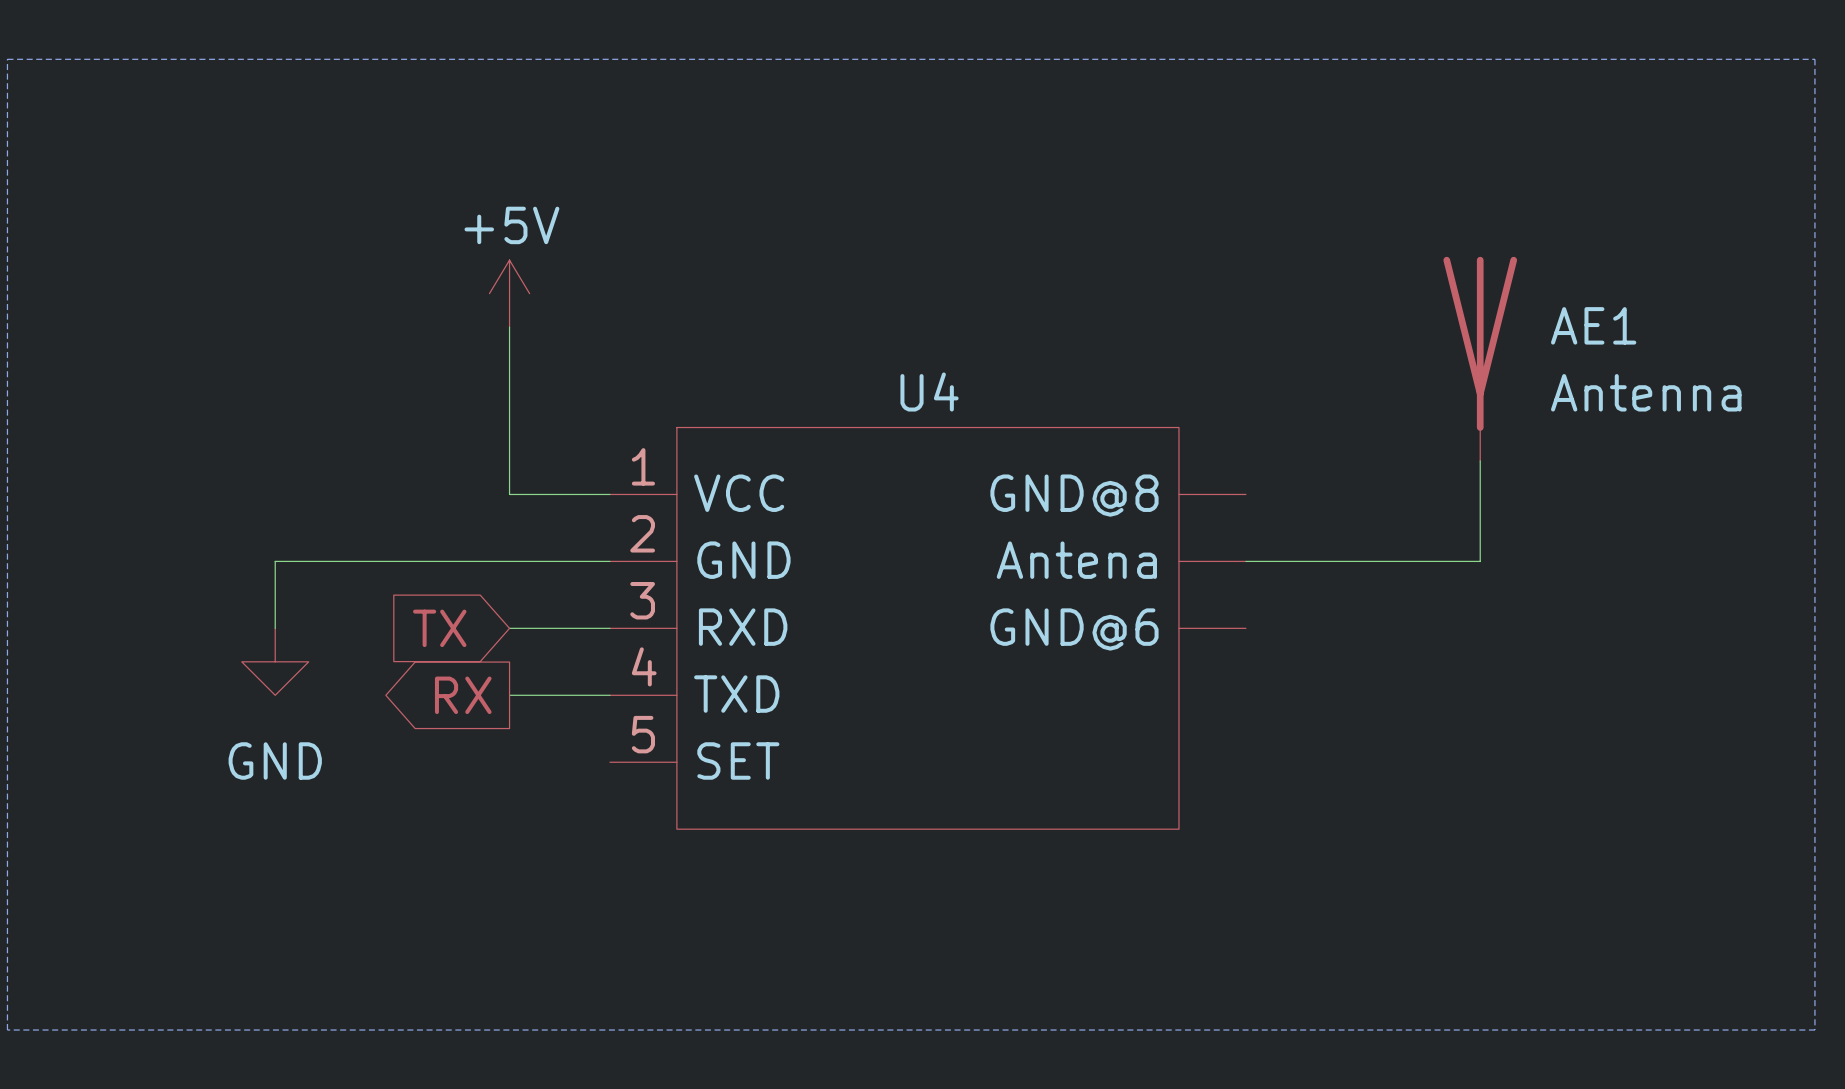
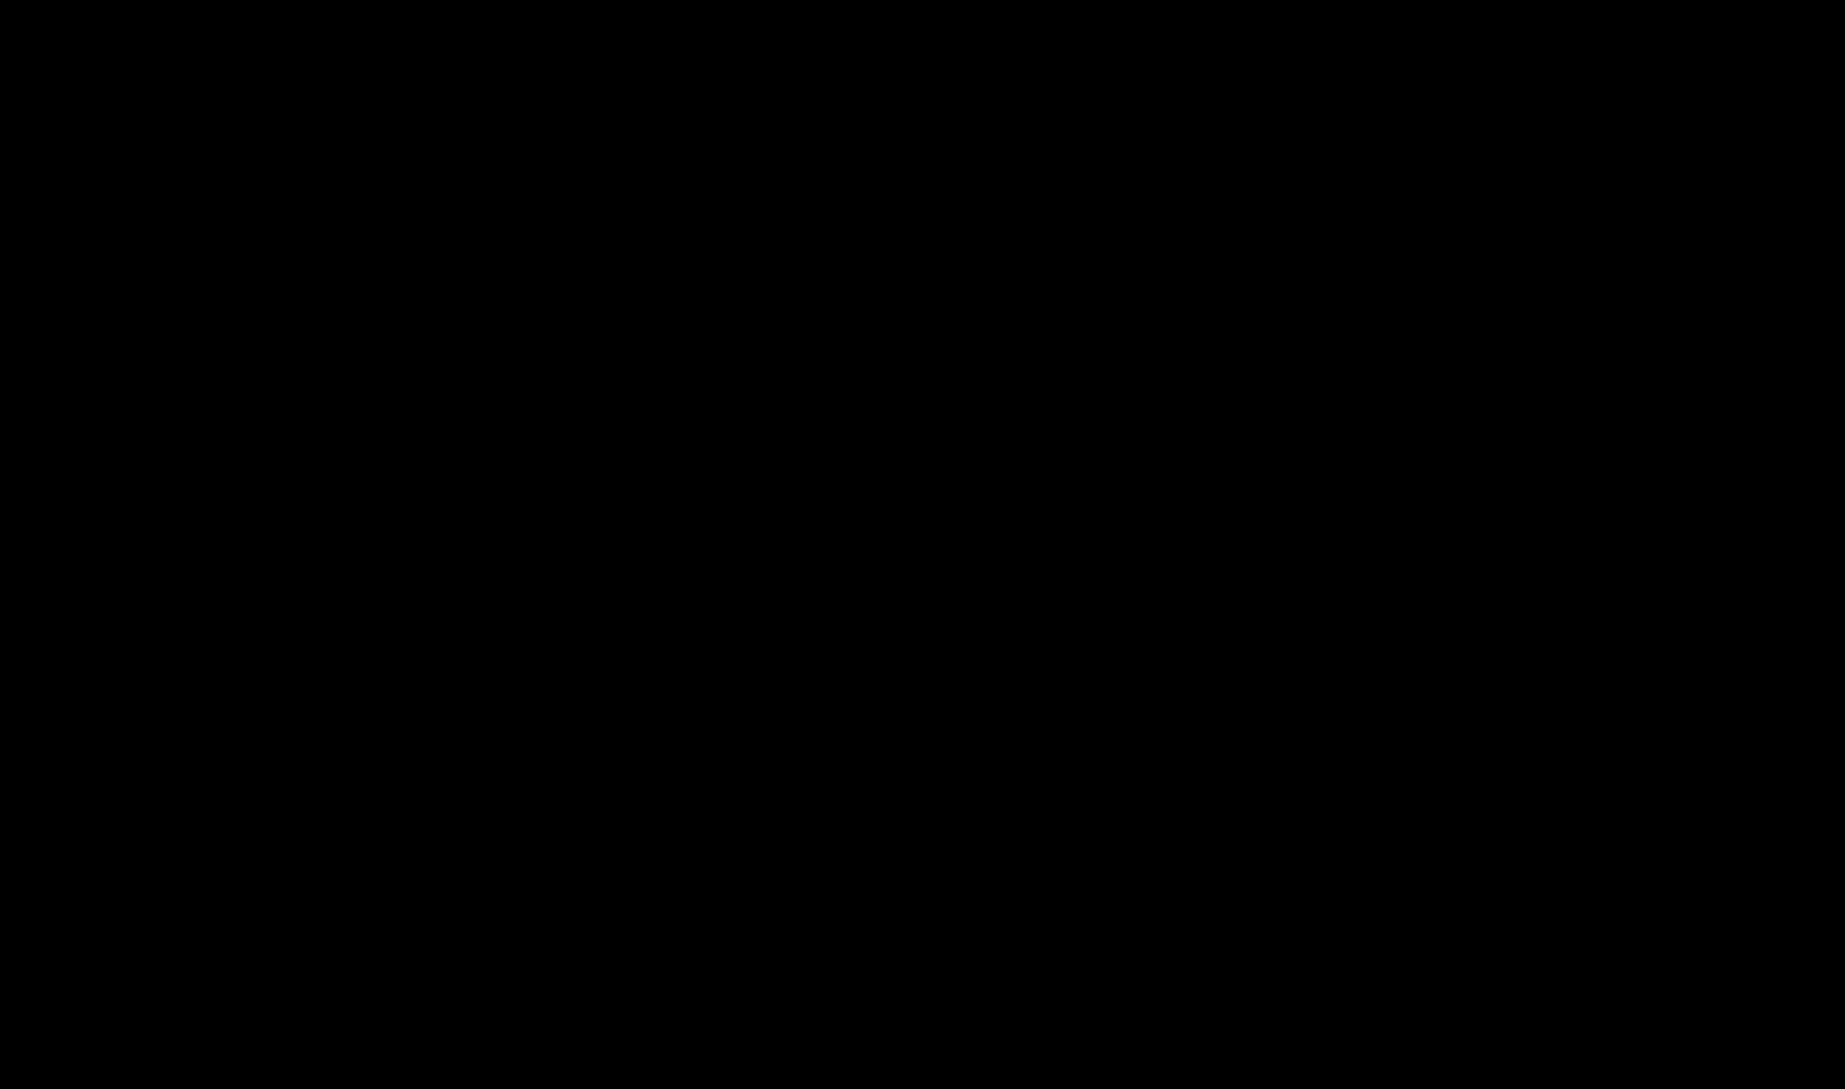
line: (7, 59) (1814, 59) (1814, 1030) (7, 1030) (7, 59) -> none
power symbol: +5V (509, 293) -> none
wire: (509, 327) (509, 494) (609, 494) -> none
AE1: Antenna (1480, 358) -> none
wire: (1480, 460) (1480, 561) (1245, 561) -> none
wire: (609, 561) (275, 561) (275, 628) -> none
global label: TX (439, 628) -> none
wire: (509, 628) (609, 628) -> none
U4: (927, 628) -> none
power symbol: GND (275, 661) -> none
global label: RX (463, 695) -> none
wire: (509, 695) (609, 695) -> none

